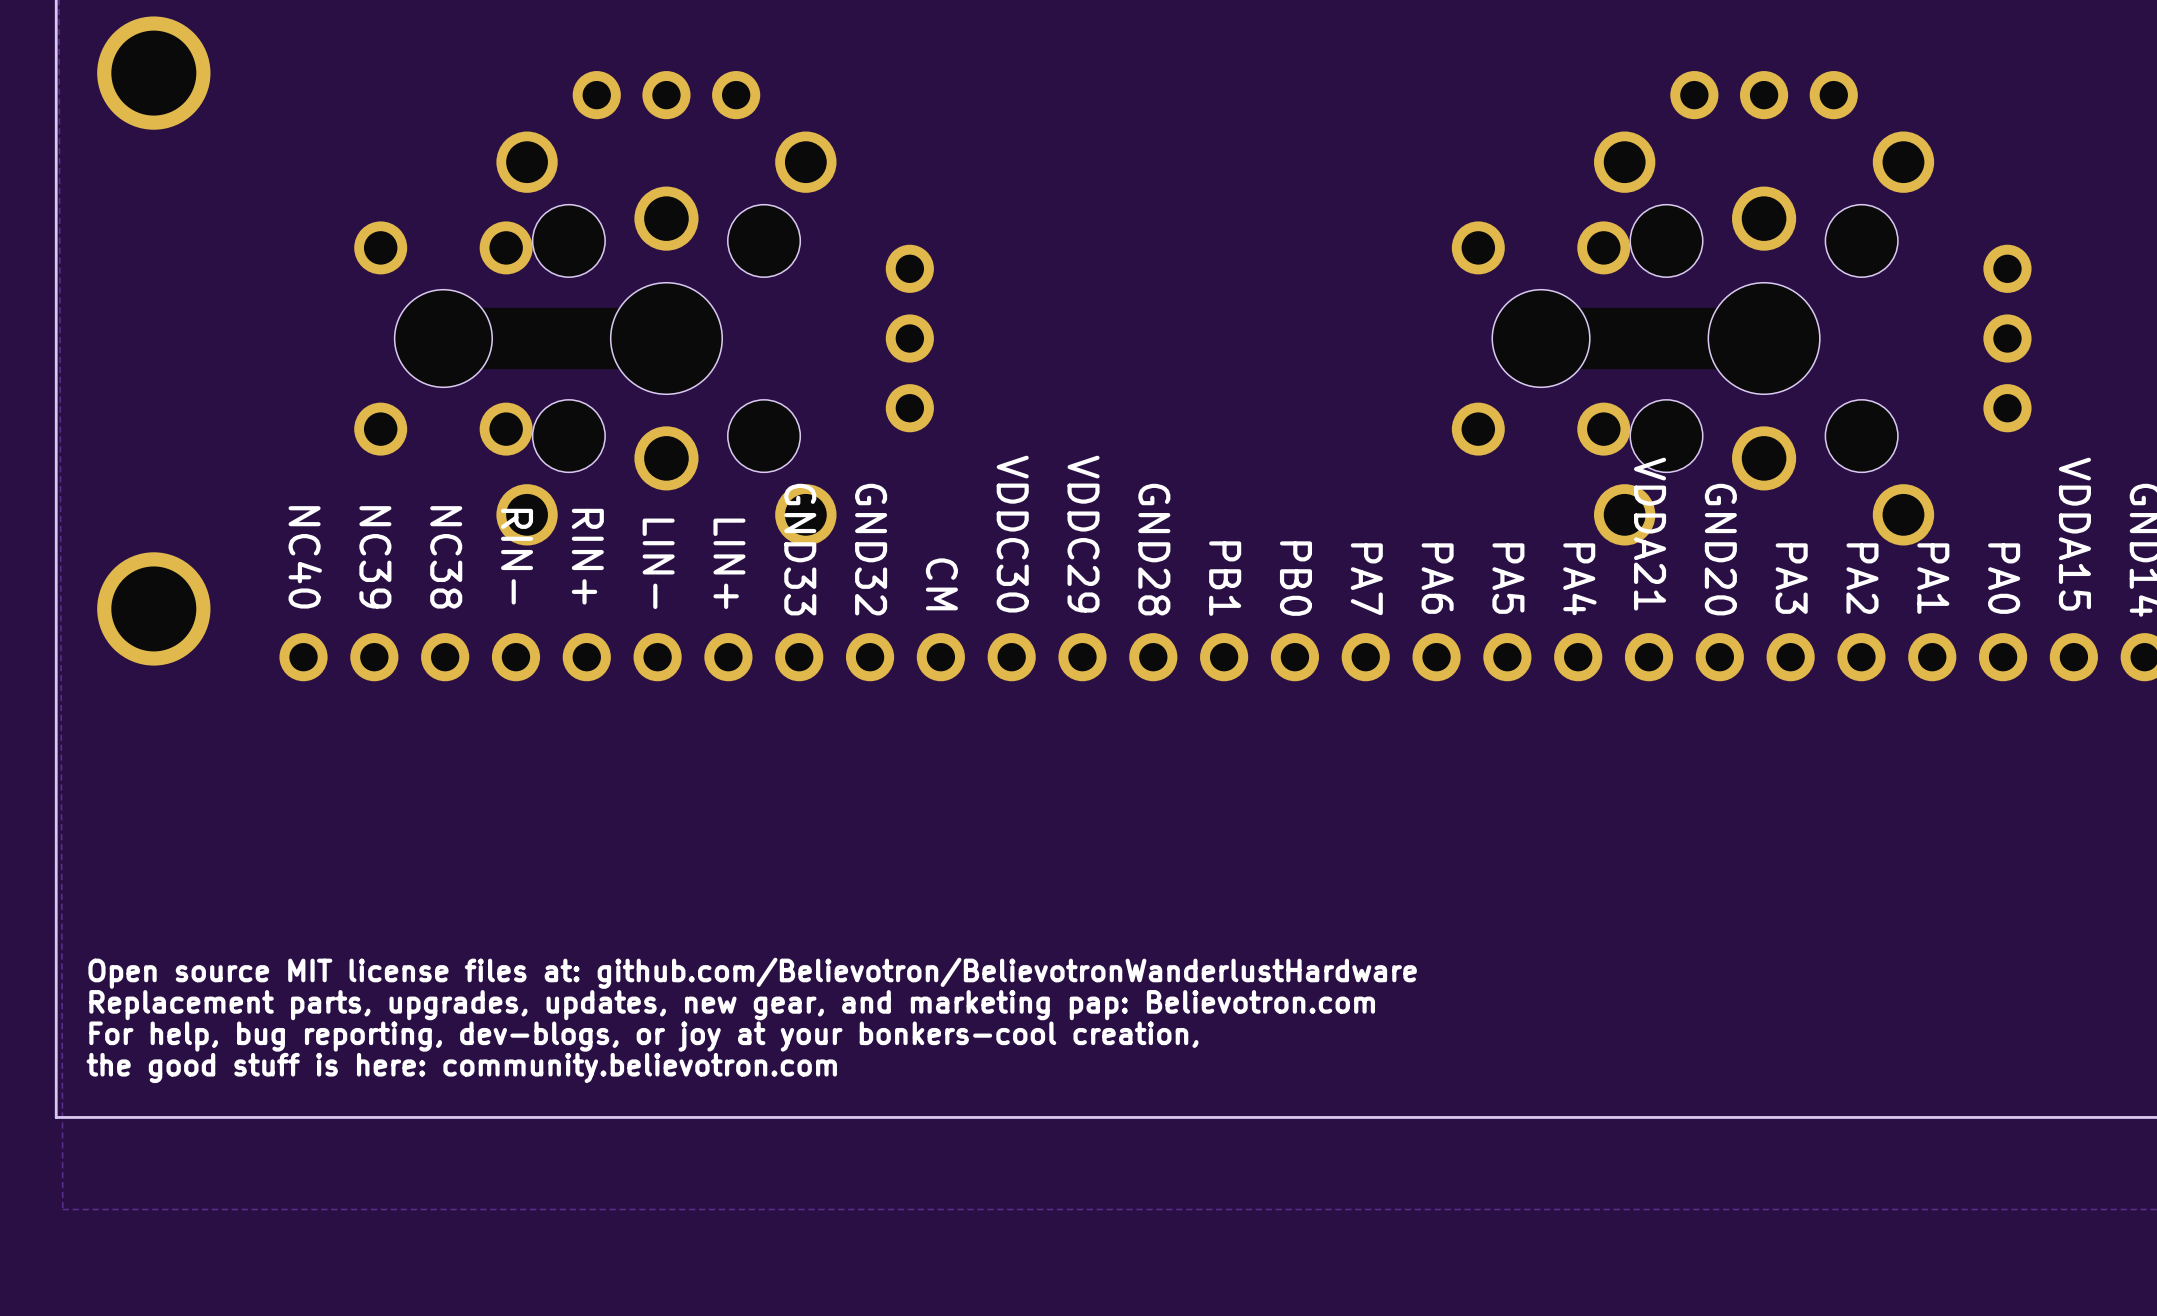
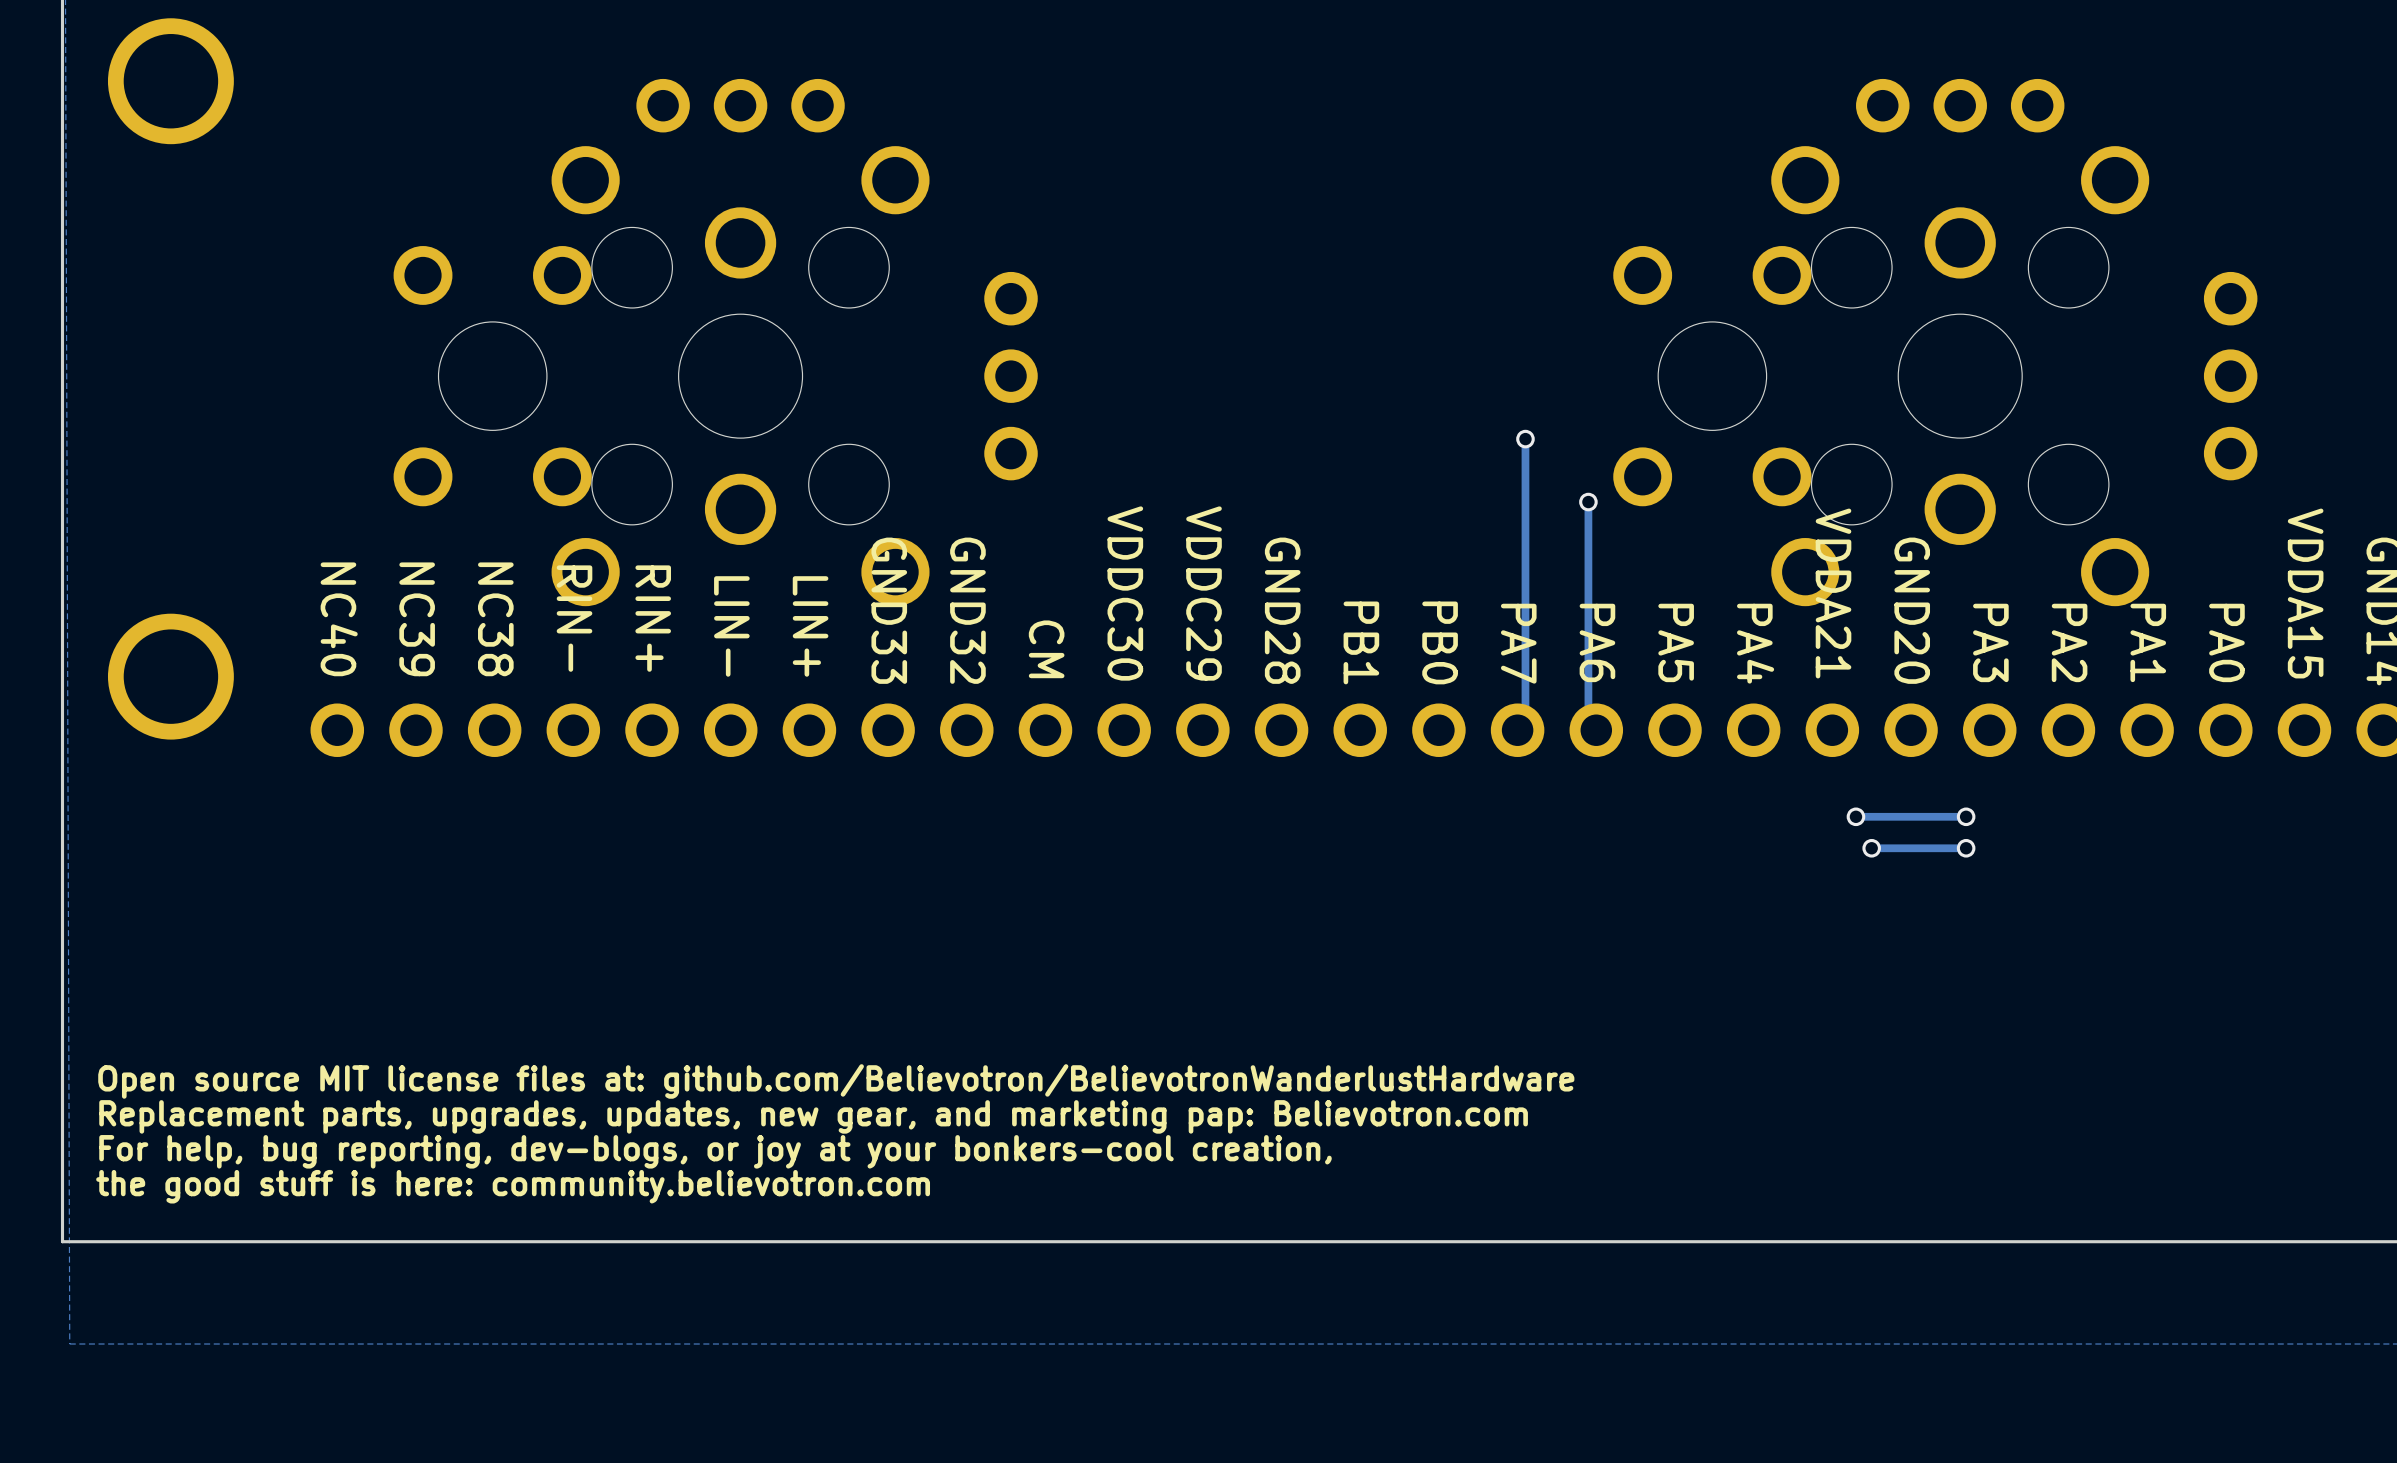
track: none -> (1525, 439) (1525, 722) (1517, 730)
via: none -> (1525, 439)
track: none -> (1588, 502) (1588, 722) (1596, 730)
via: none -> (1588, 502)
via: none -> (1855, 816)
track: none -> (1966, 816) (1855, 816)
via: none -> (1966, 816)
via: none -> (1871, 848)
track: none -> (1966, 848) (1871, 848)
via: none -> (1966, 848)

